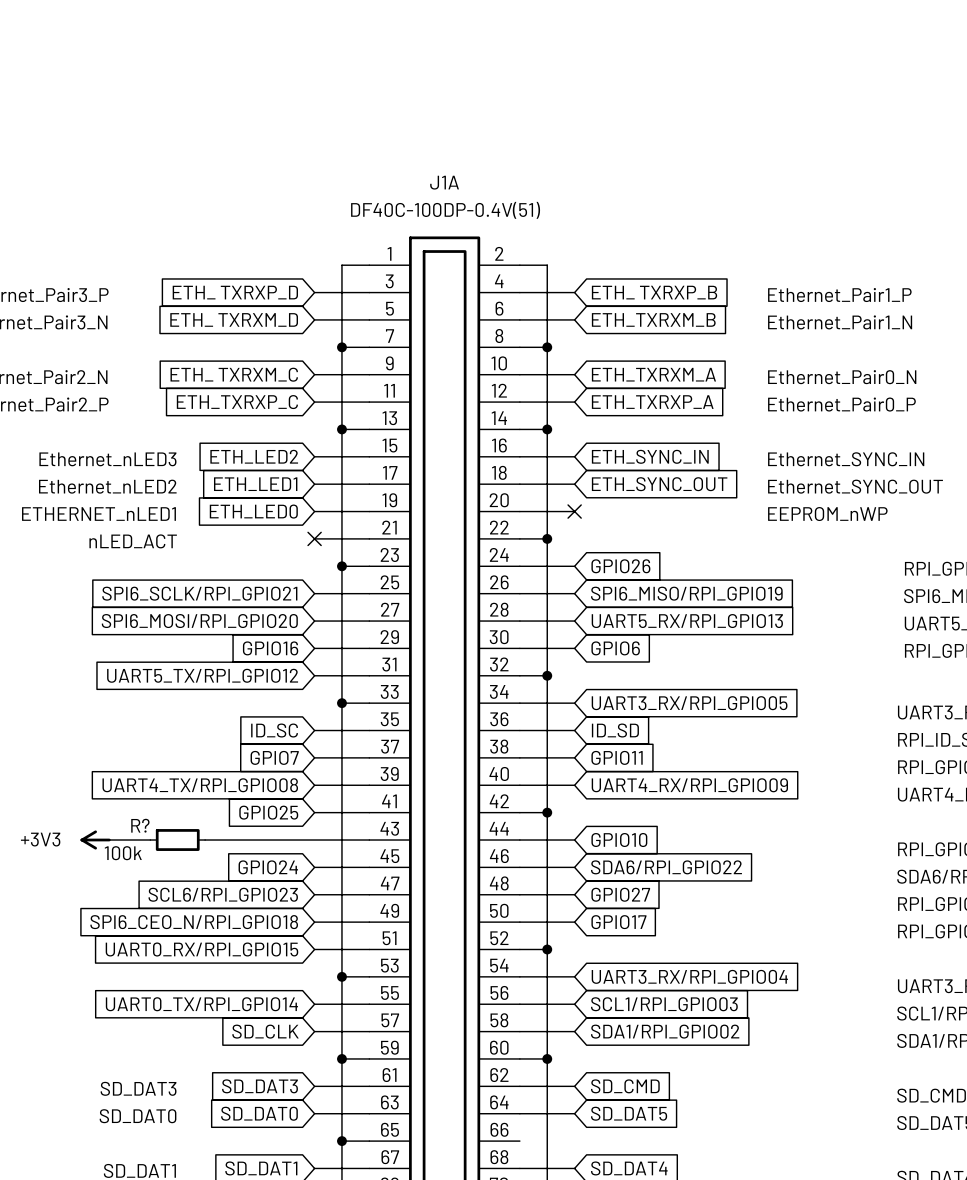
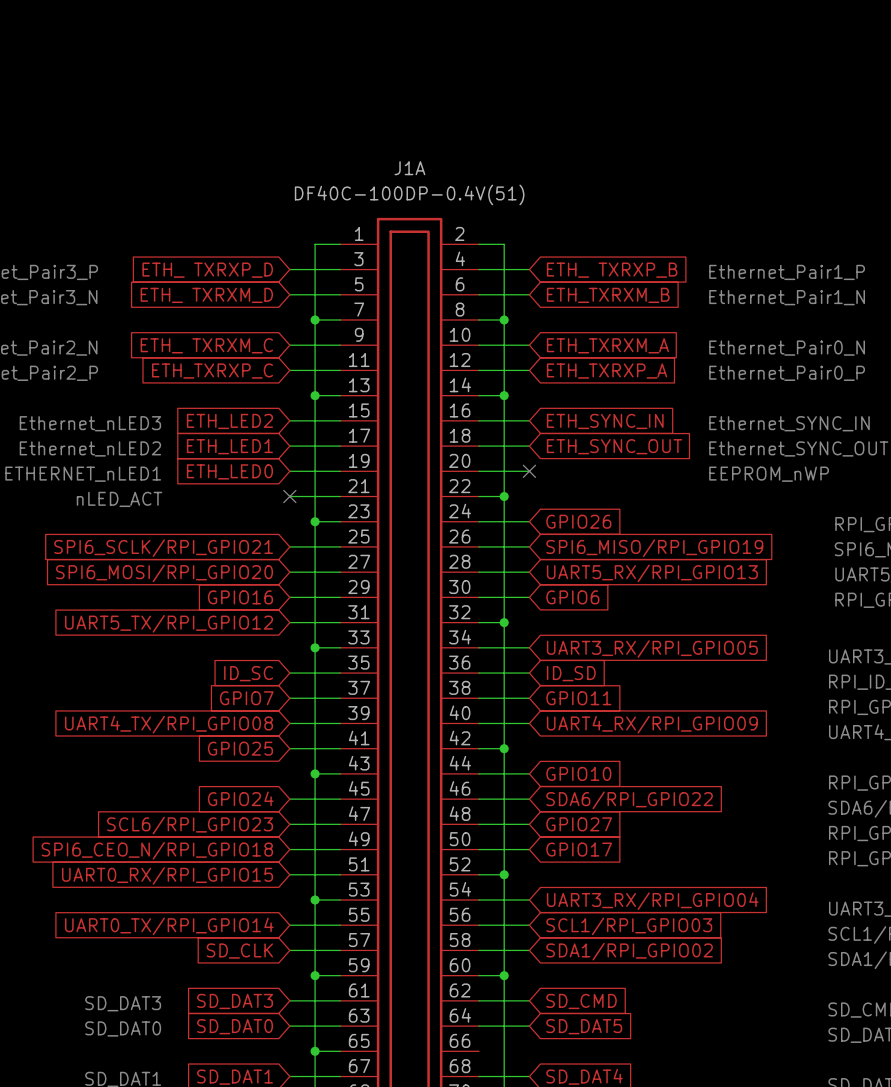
power symbol: +3V3 (95, 840) -> none
wire: (109, 840) (150, 840) -> none
R?: (177, 840) -> none
wire: (205, 840) (341, 840) -> none
junction: none -> (315, 773)

